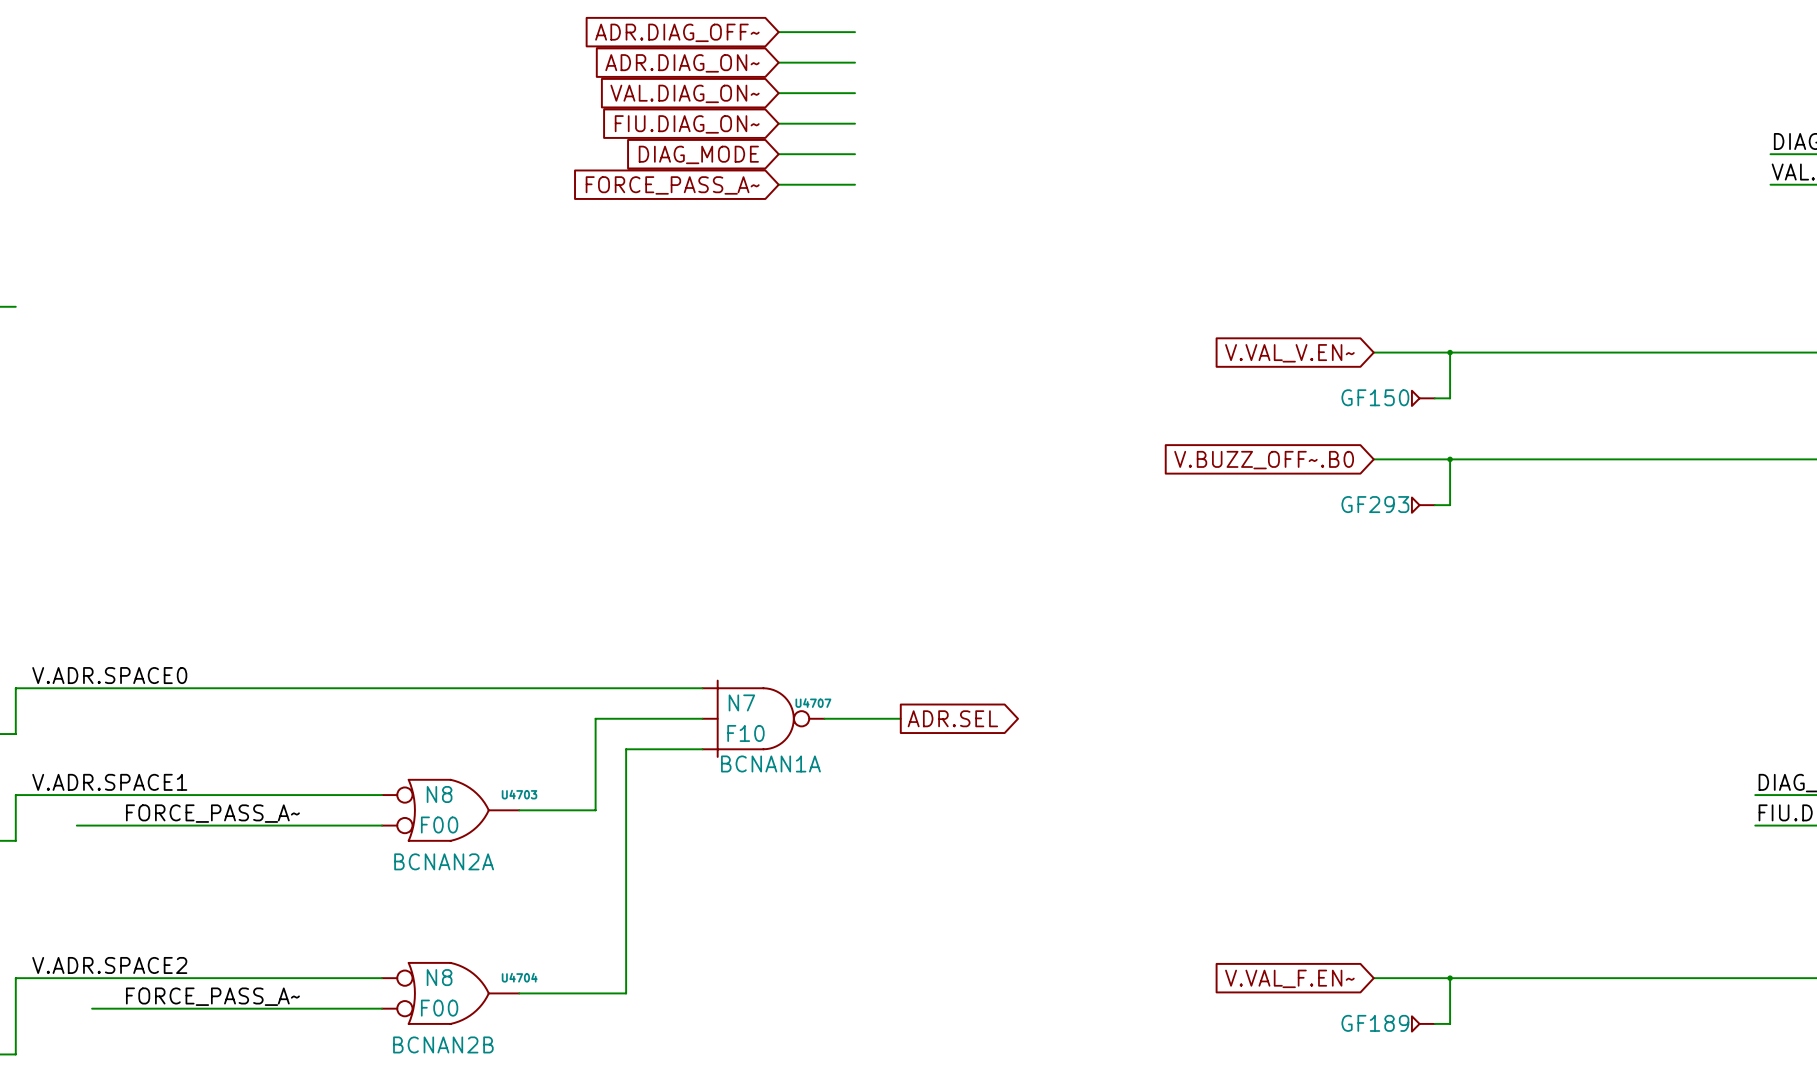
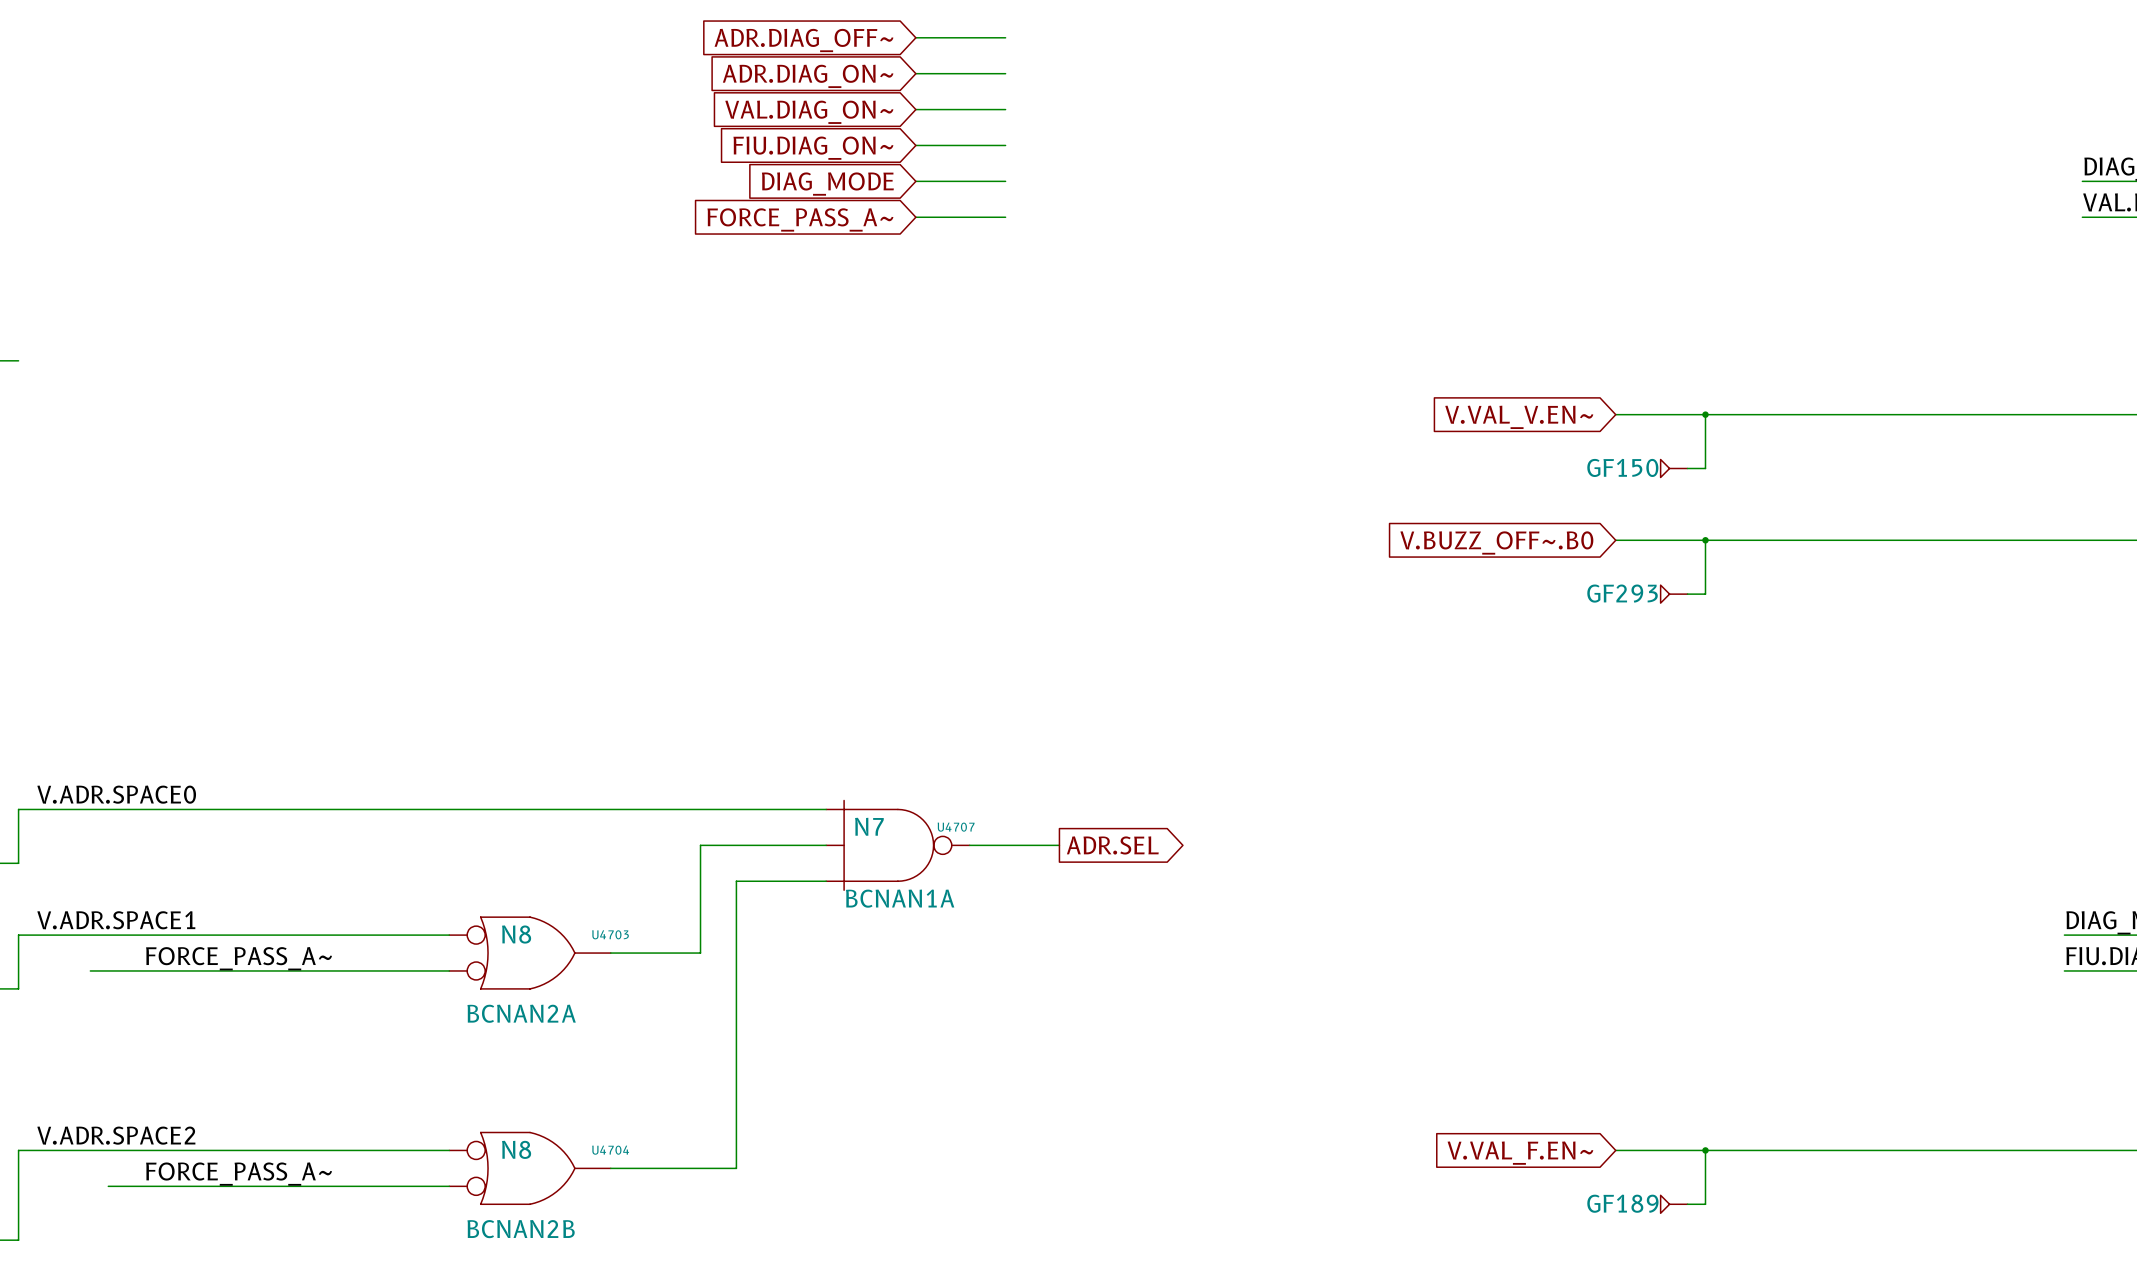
U4707 value: F10 (745, 733) -> none
U4703 value: F00 (439, 825) -> none
U4704 value: F00 (439, 1008) -> none

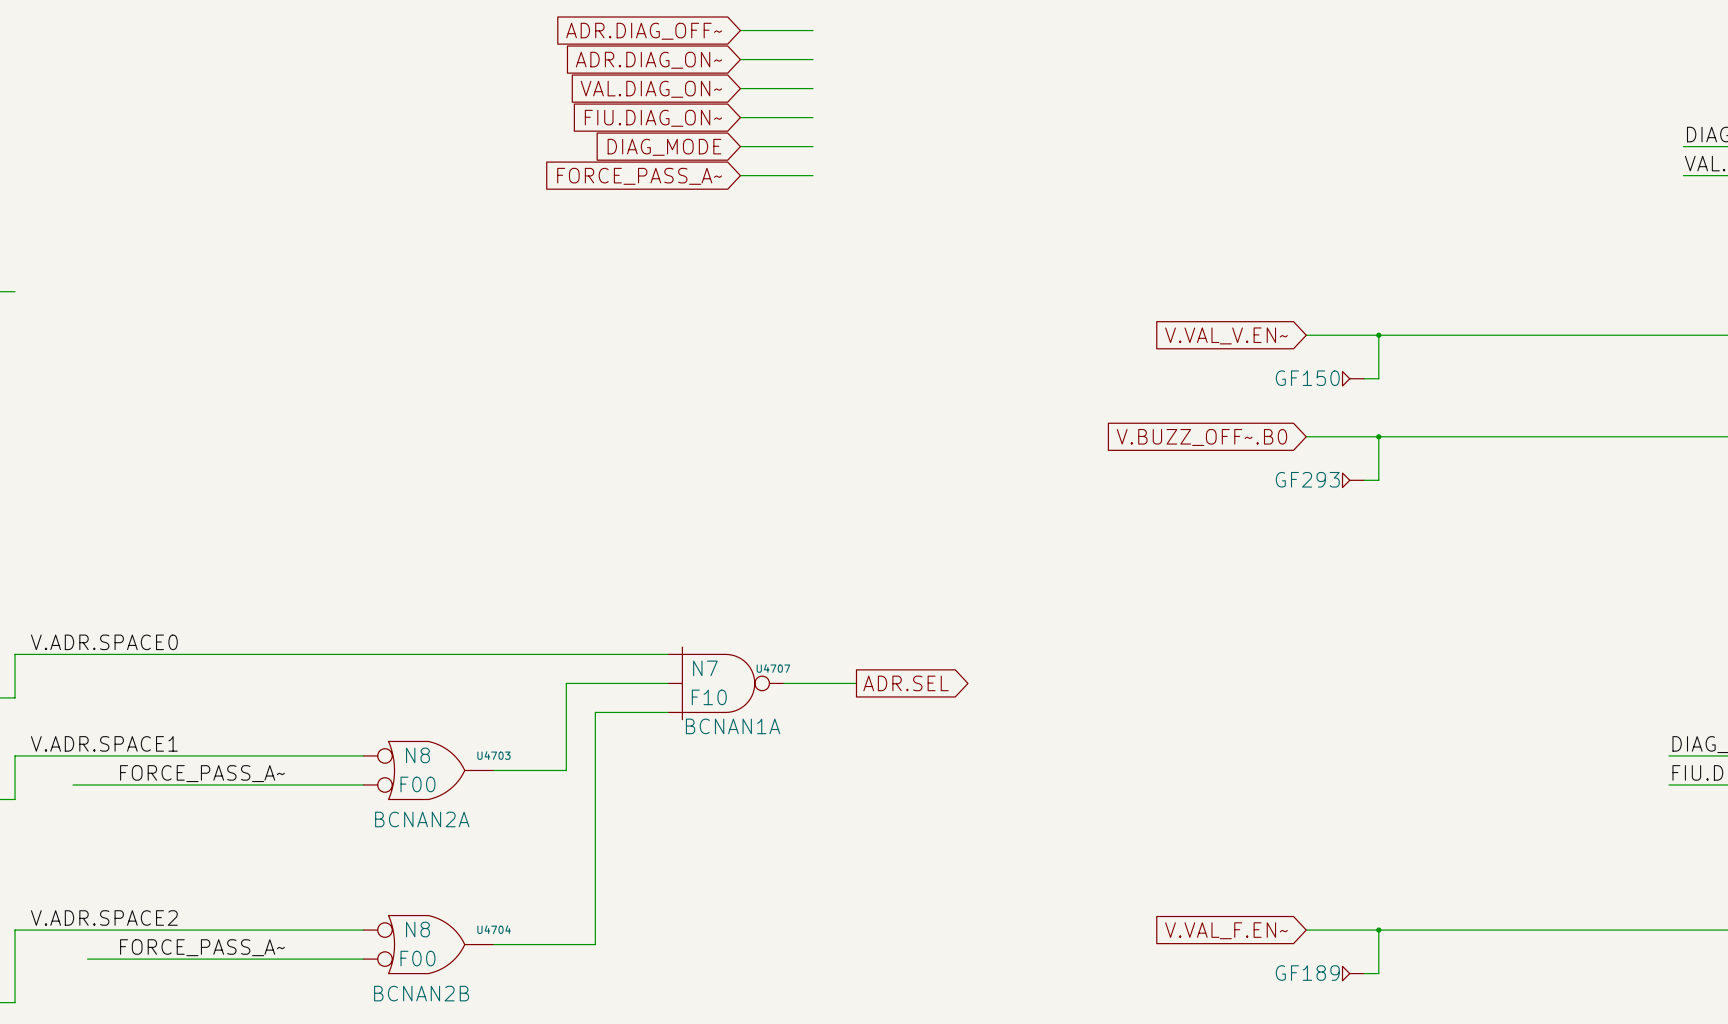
U4707 value: none -> F10 (709, 697)
U4703 value: none -> F00 (417, 784)
U4704 value: none -> F00 (417, 958)

